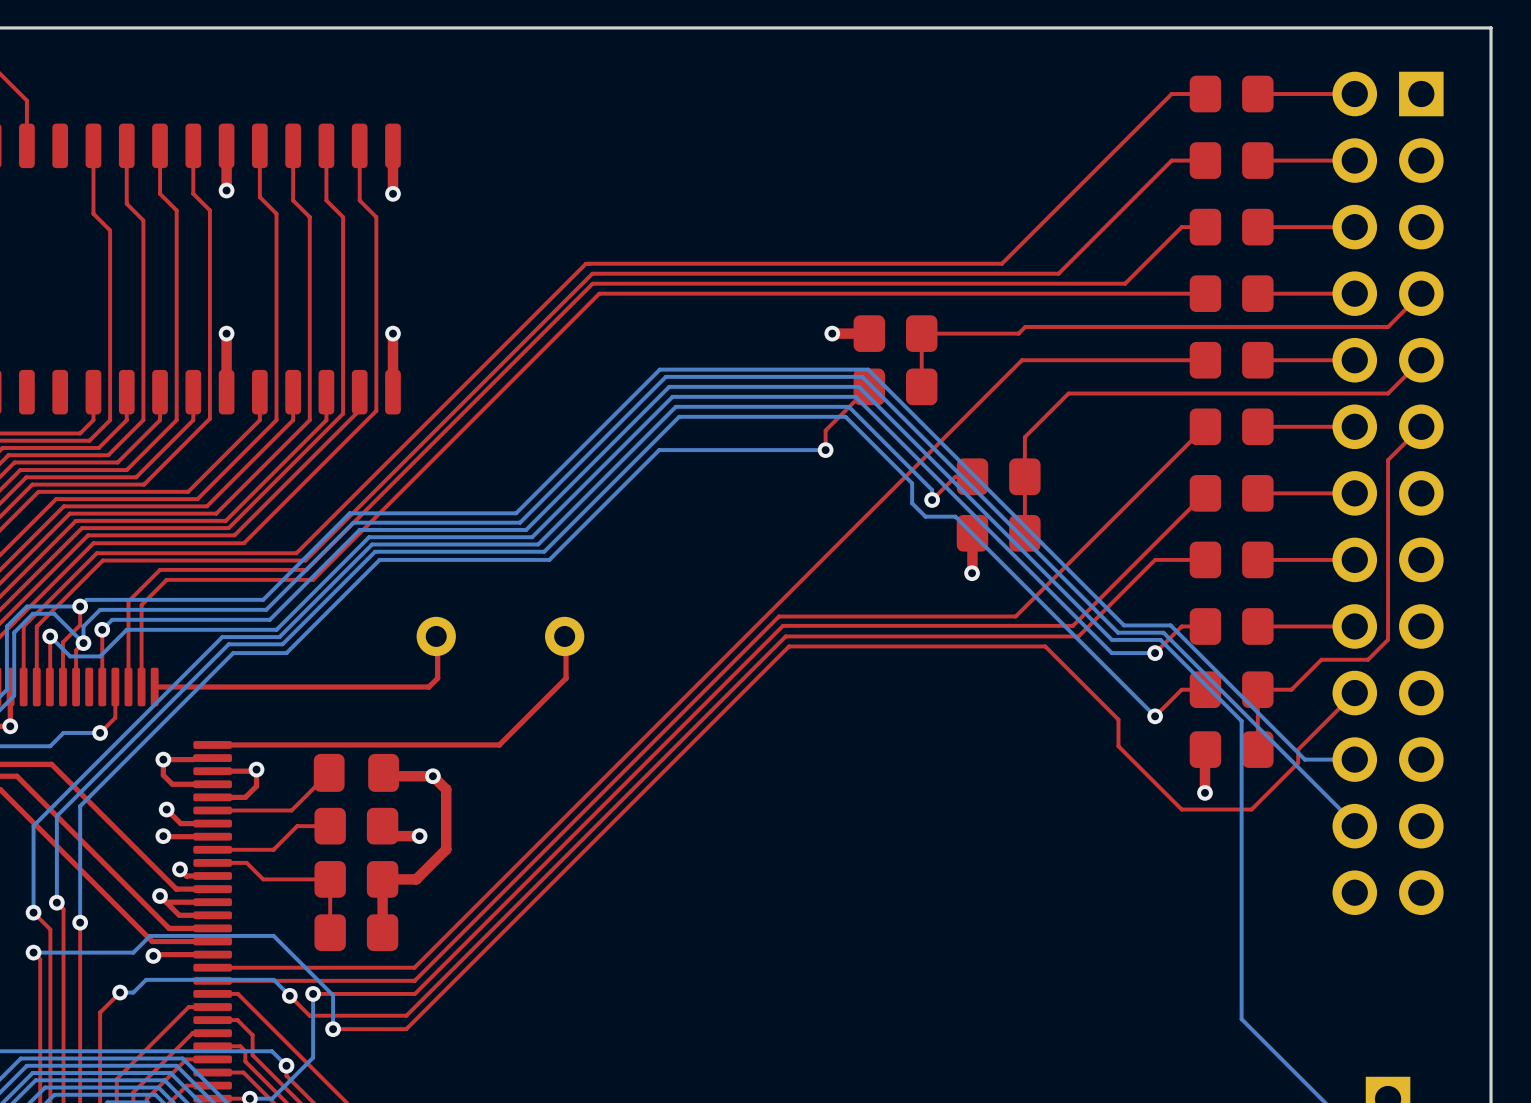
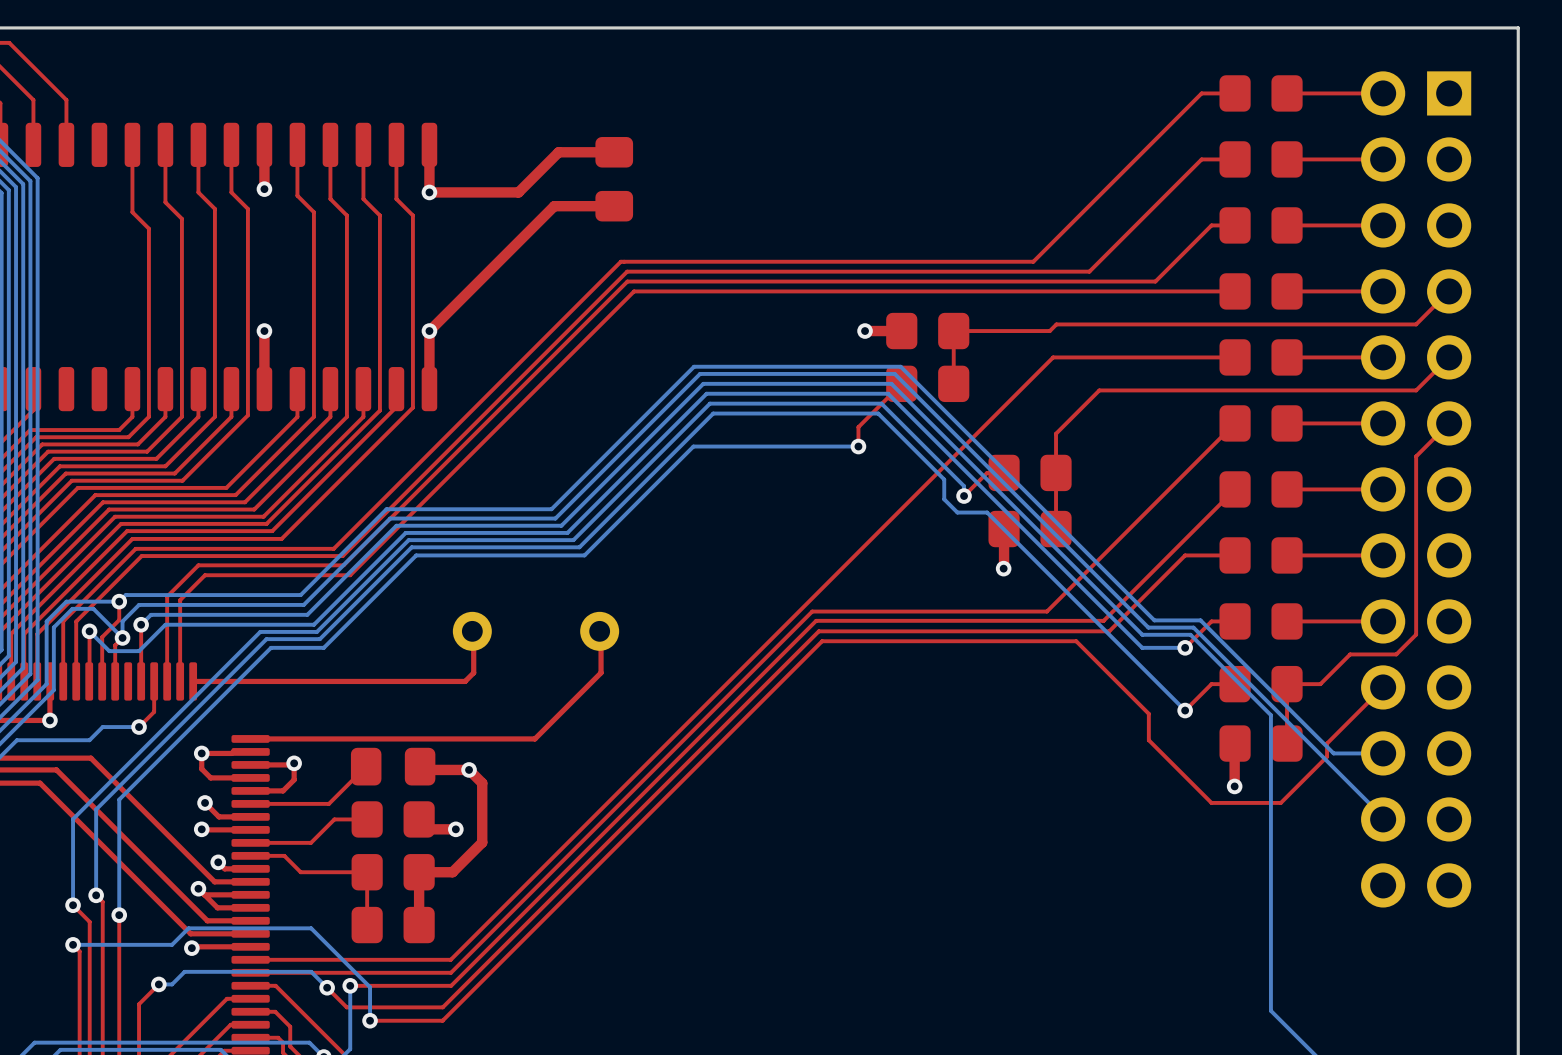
top track: none -> (614, 152) (558, 152) (518, 192) (429, 192)
part: none -> (614, 179)
top track: none -> (614, 206) (554, 206) (429, 331)

